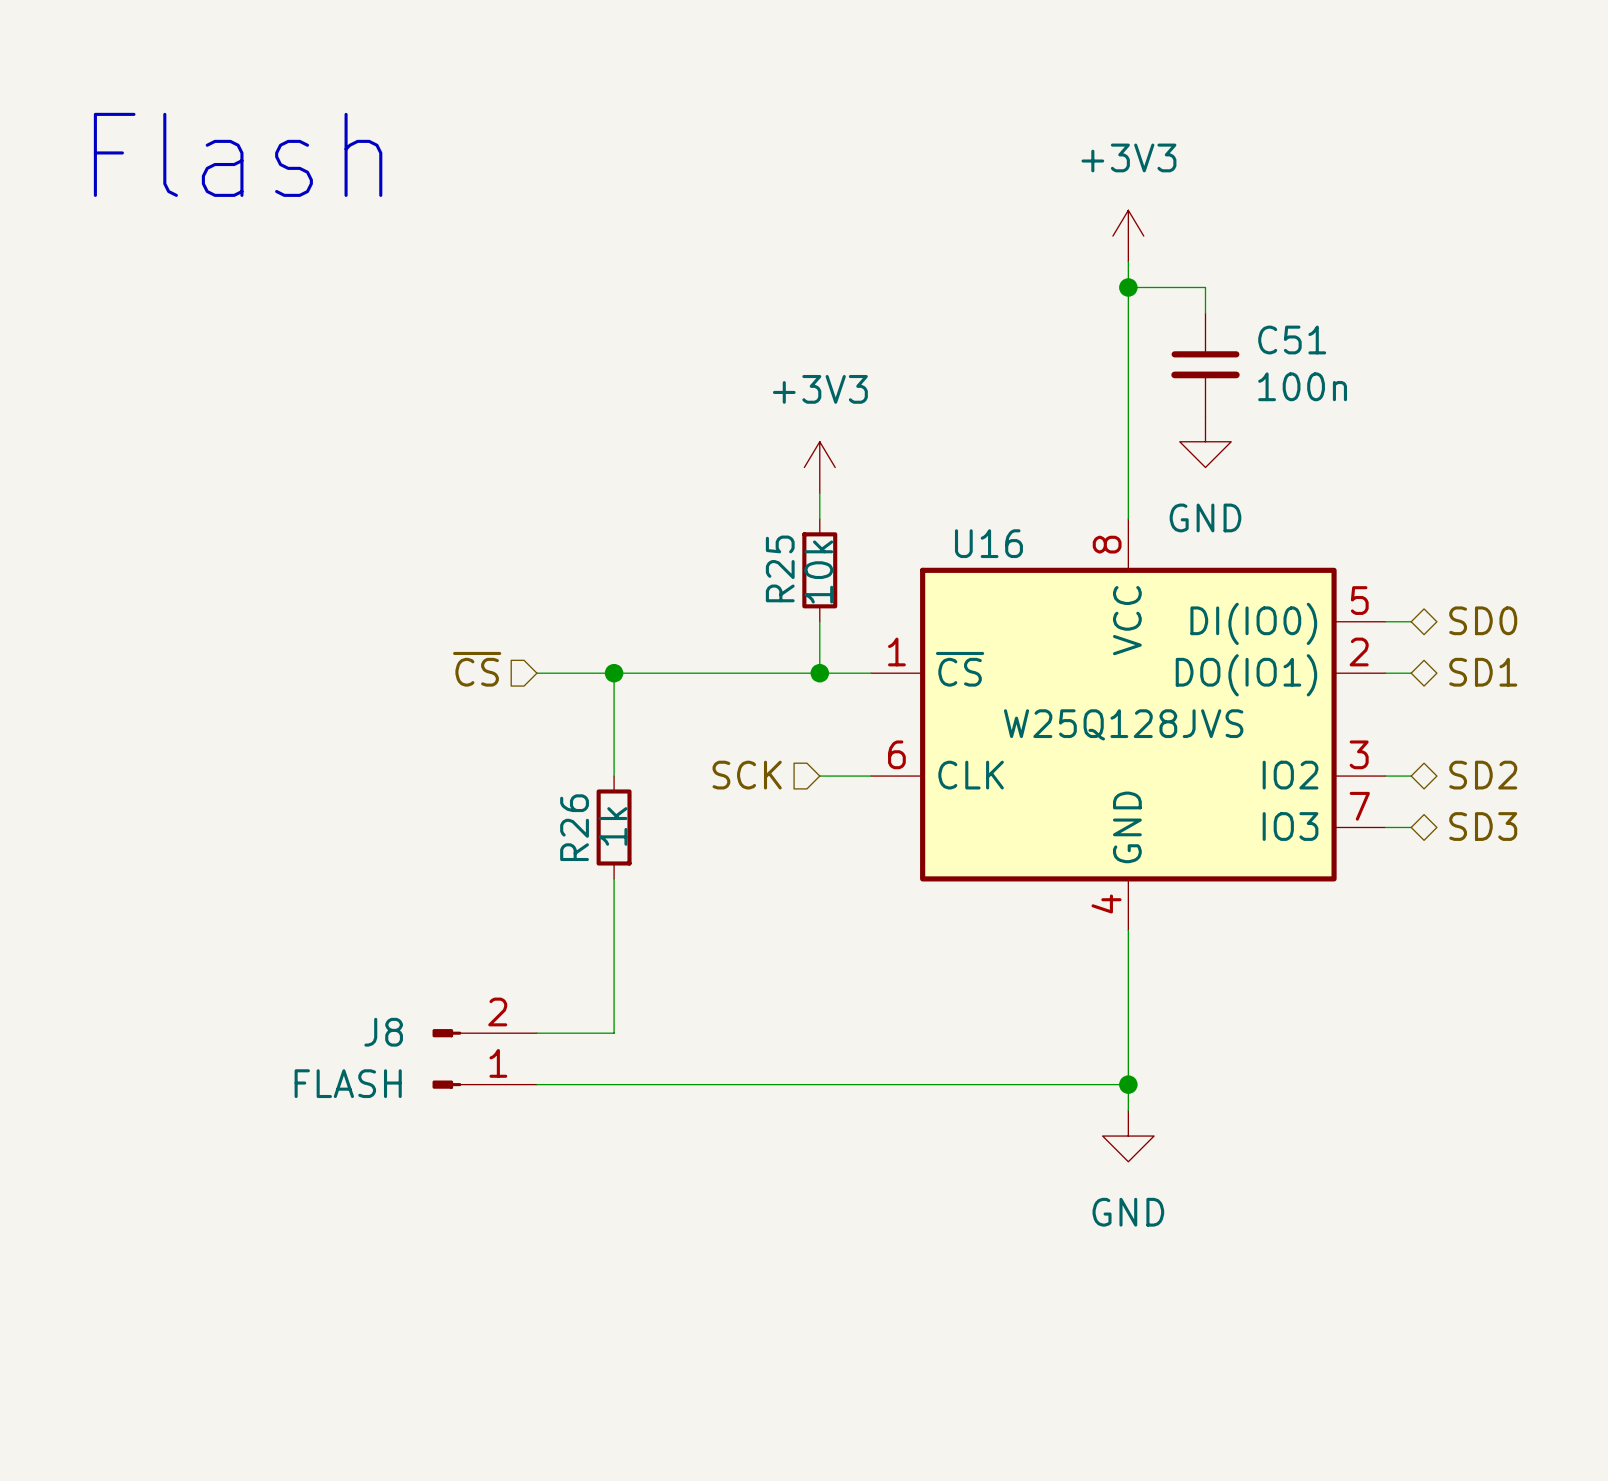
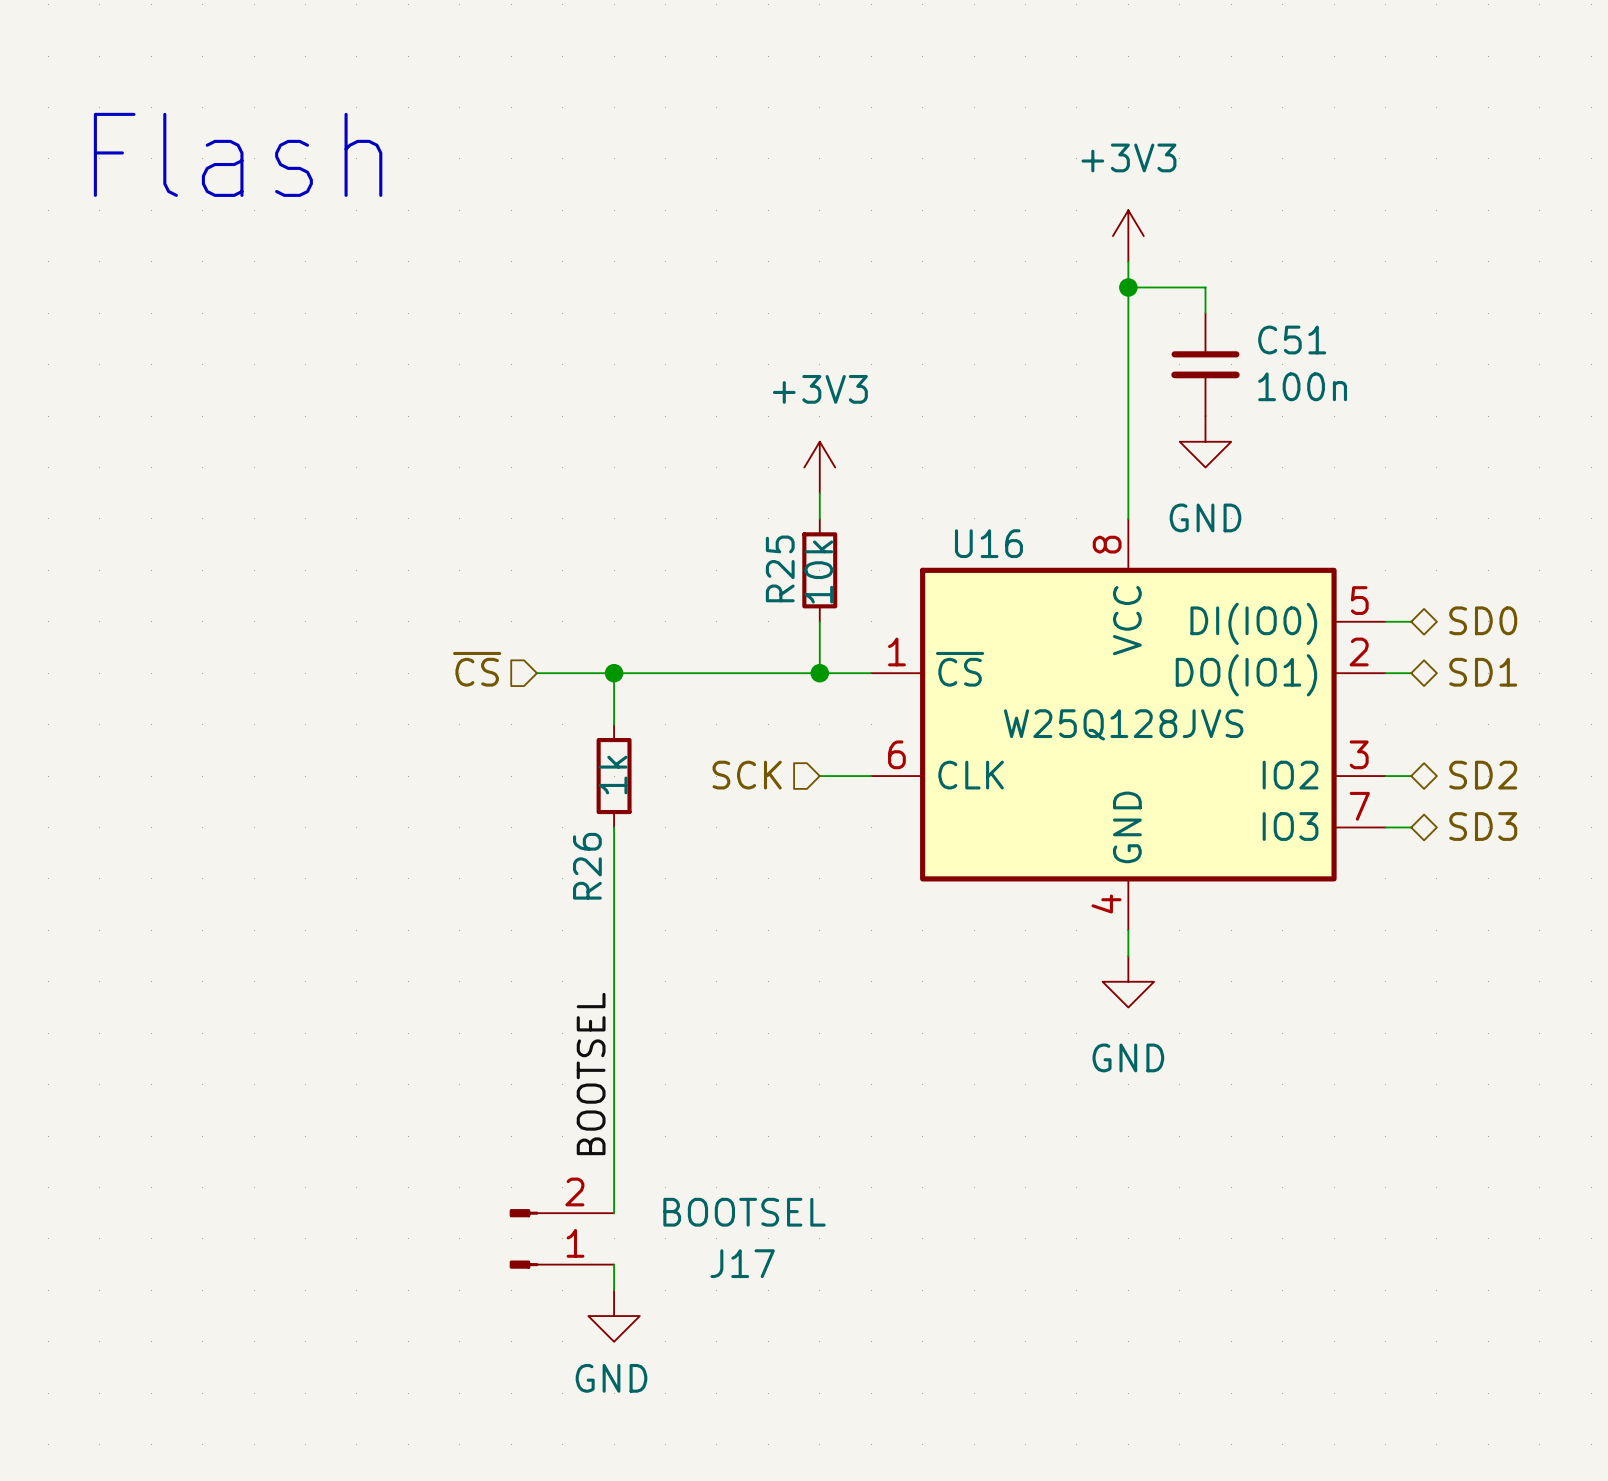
wire: (614, 724) (614, 776) -> (614, 827) (614, 878)
R26 name position: R26 (574, 827) -> R26 (587, 866)
R26 position: (614, 827) -> (614, 776)
wire: (1128, 956) (1128, 1110) -> none
wire: (536, 1033) (614, 1033) -> (614, 1213) (614, 1033)
J8: FLASH (484, 1058) -> none
label: none -> BOOTSEL (591, 1074)
wire: (536, 1084) (1128, 1084) -> none
junction: (1128, 1084) -> none
power symbol position: GND (1128, 1136) -> GND (1128, 981)
J17: none -> BOOTSEL (561, 1238)
wire: none -> (614, 1264) (614, 1290)
power symbol: none -> GND (614, 1316)

